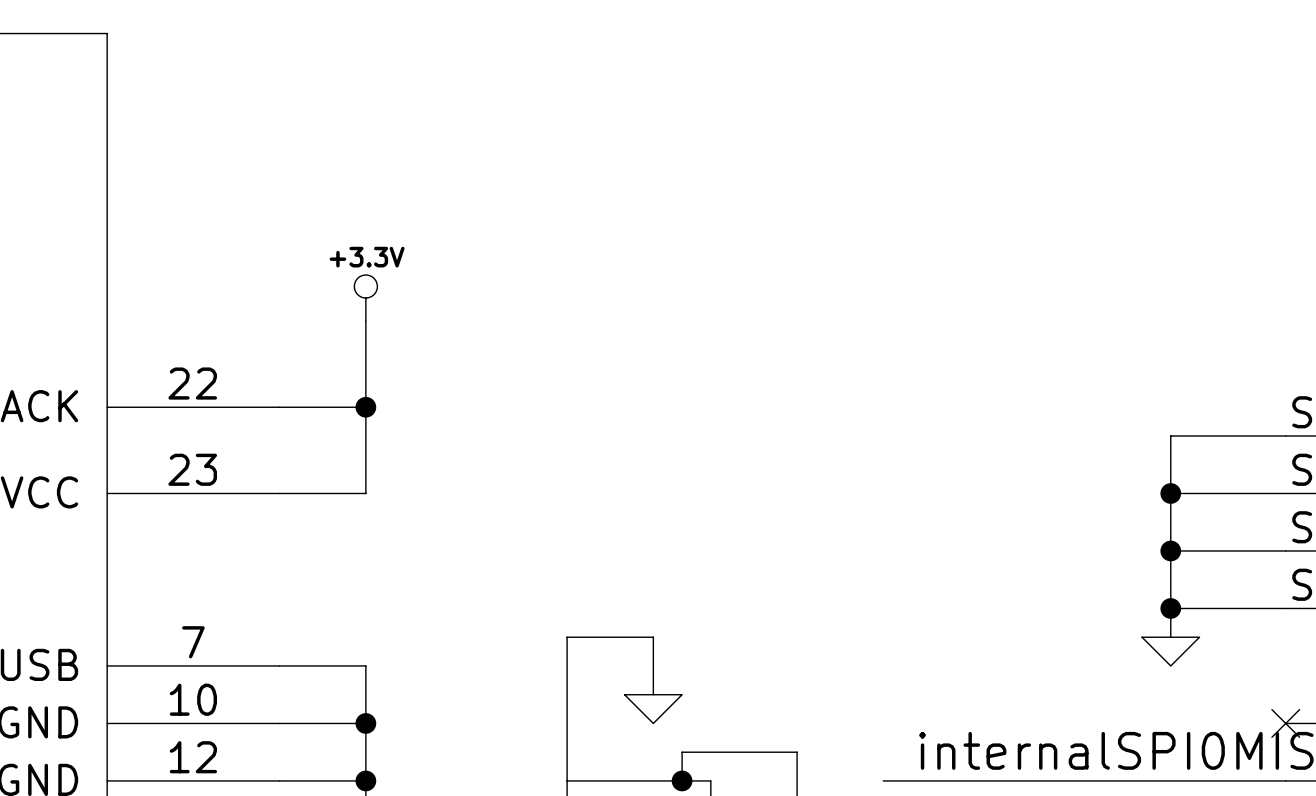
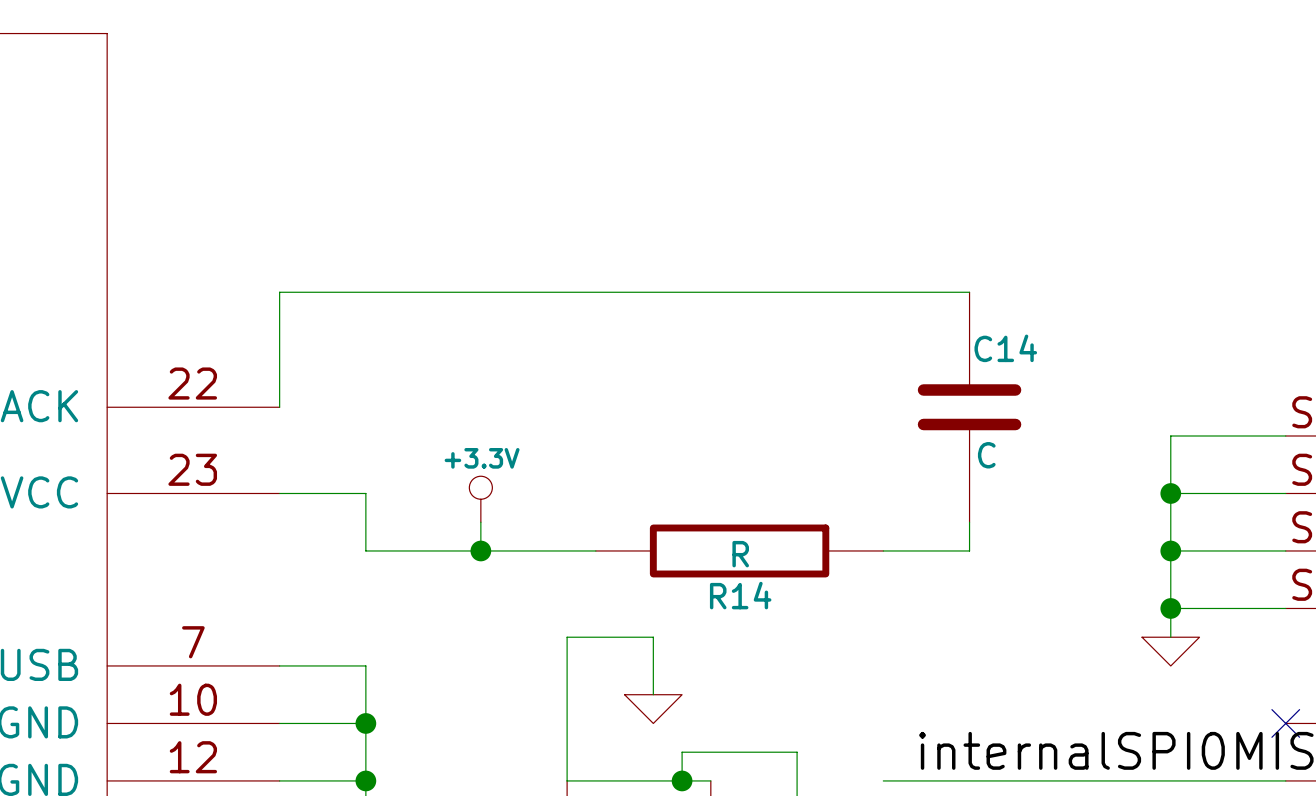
power symbol position: +3.3V (365, 298) -> +3.3V (480, 499)
wire: (365, 321) (365, 493) -> (595, 550) (365, 550) (365, 493)
wire: (279, 407) (365, 407) -> (279, 407) (279, 292) (969, 292)
junction: (365, 407) -> none
C14: none -> C (969, 407)
wire: none -> (480, 522) (480, 550)
wire: none -> (969, 522) (969, 550) (883, 550)
junction: none -> (480, 550)
R14: none -> R (739, 550)

